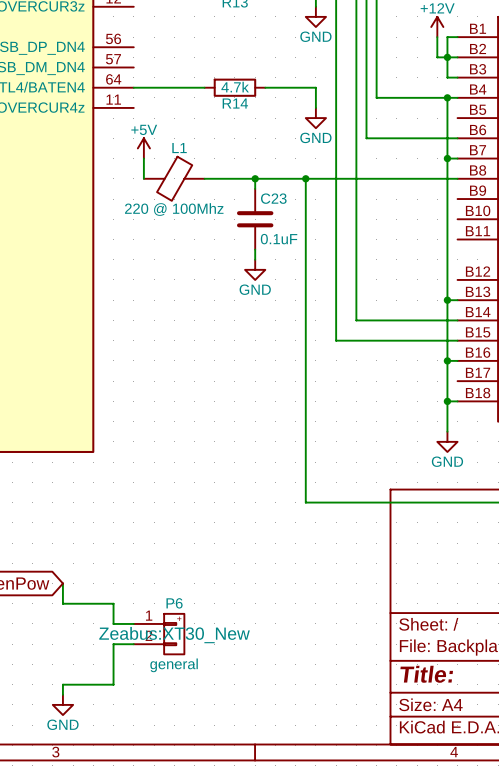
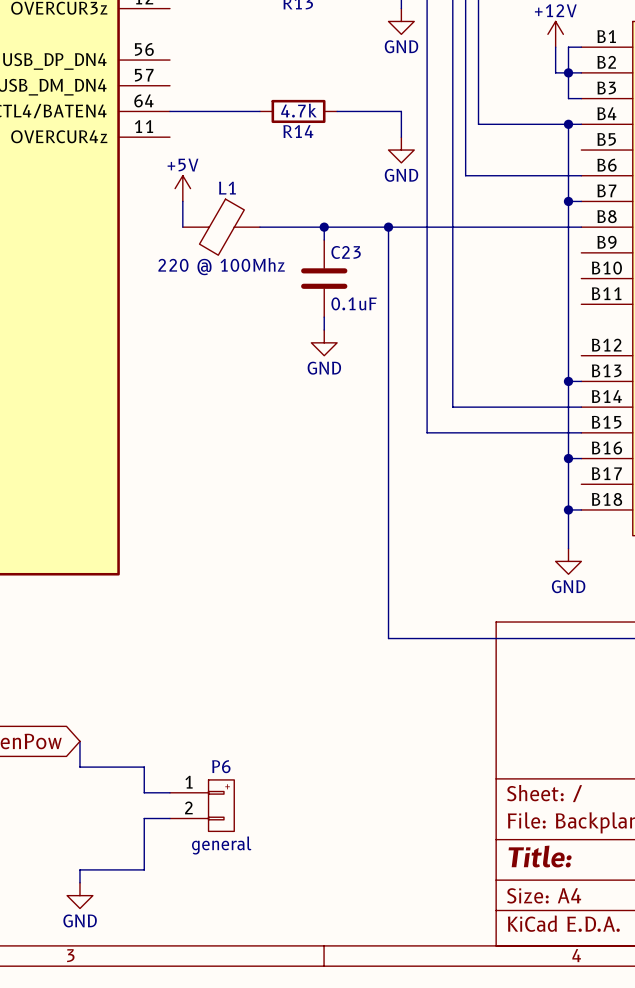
P6 text: Zeabus:XT30_New (174, 635) -> none

